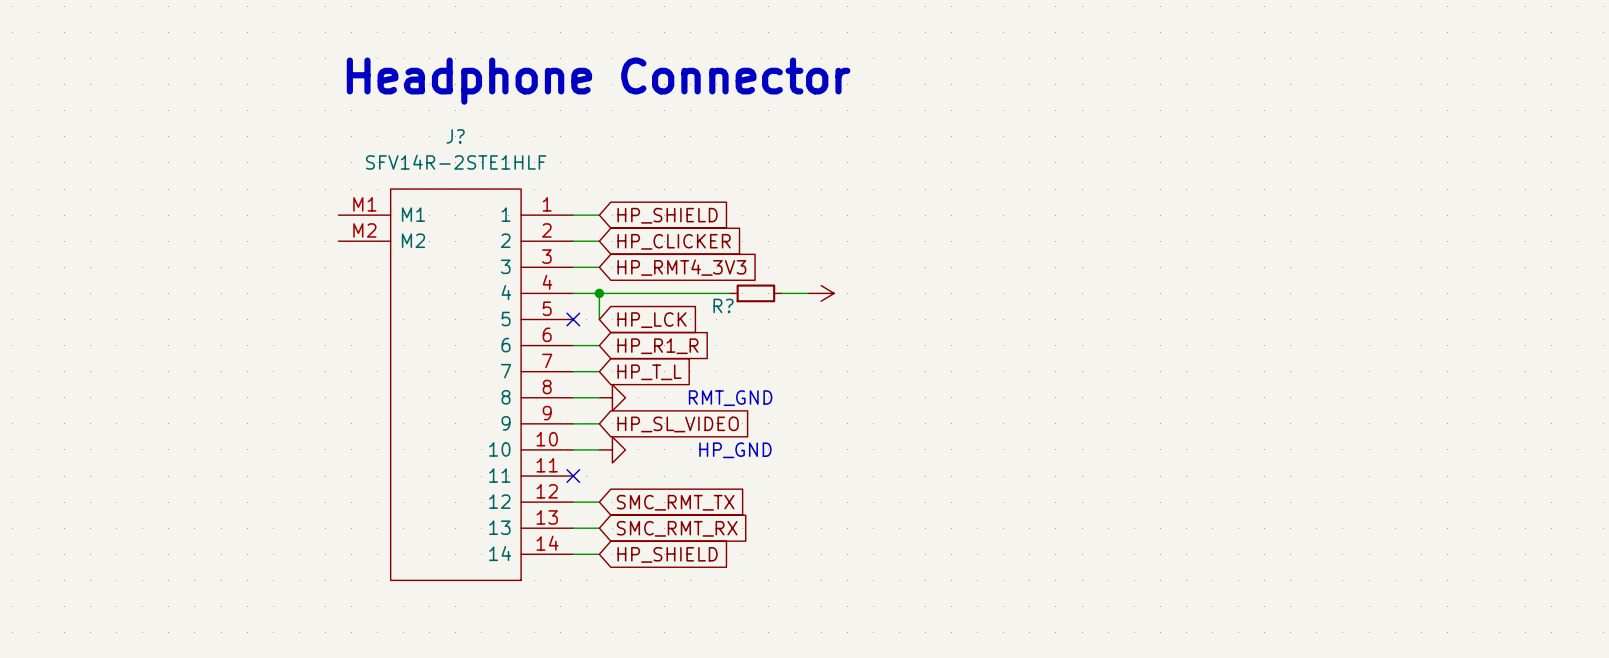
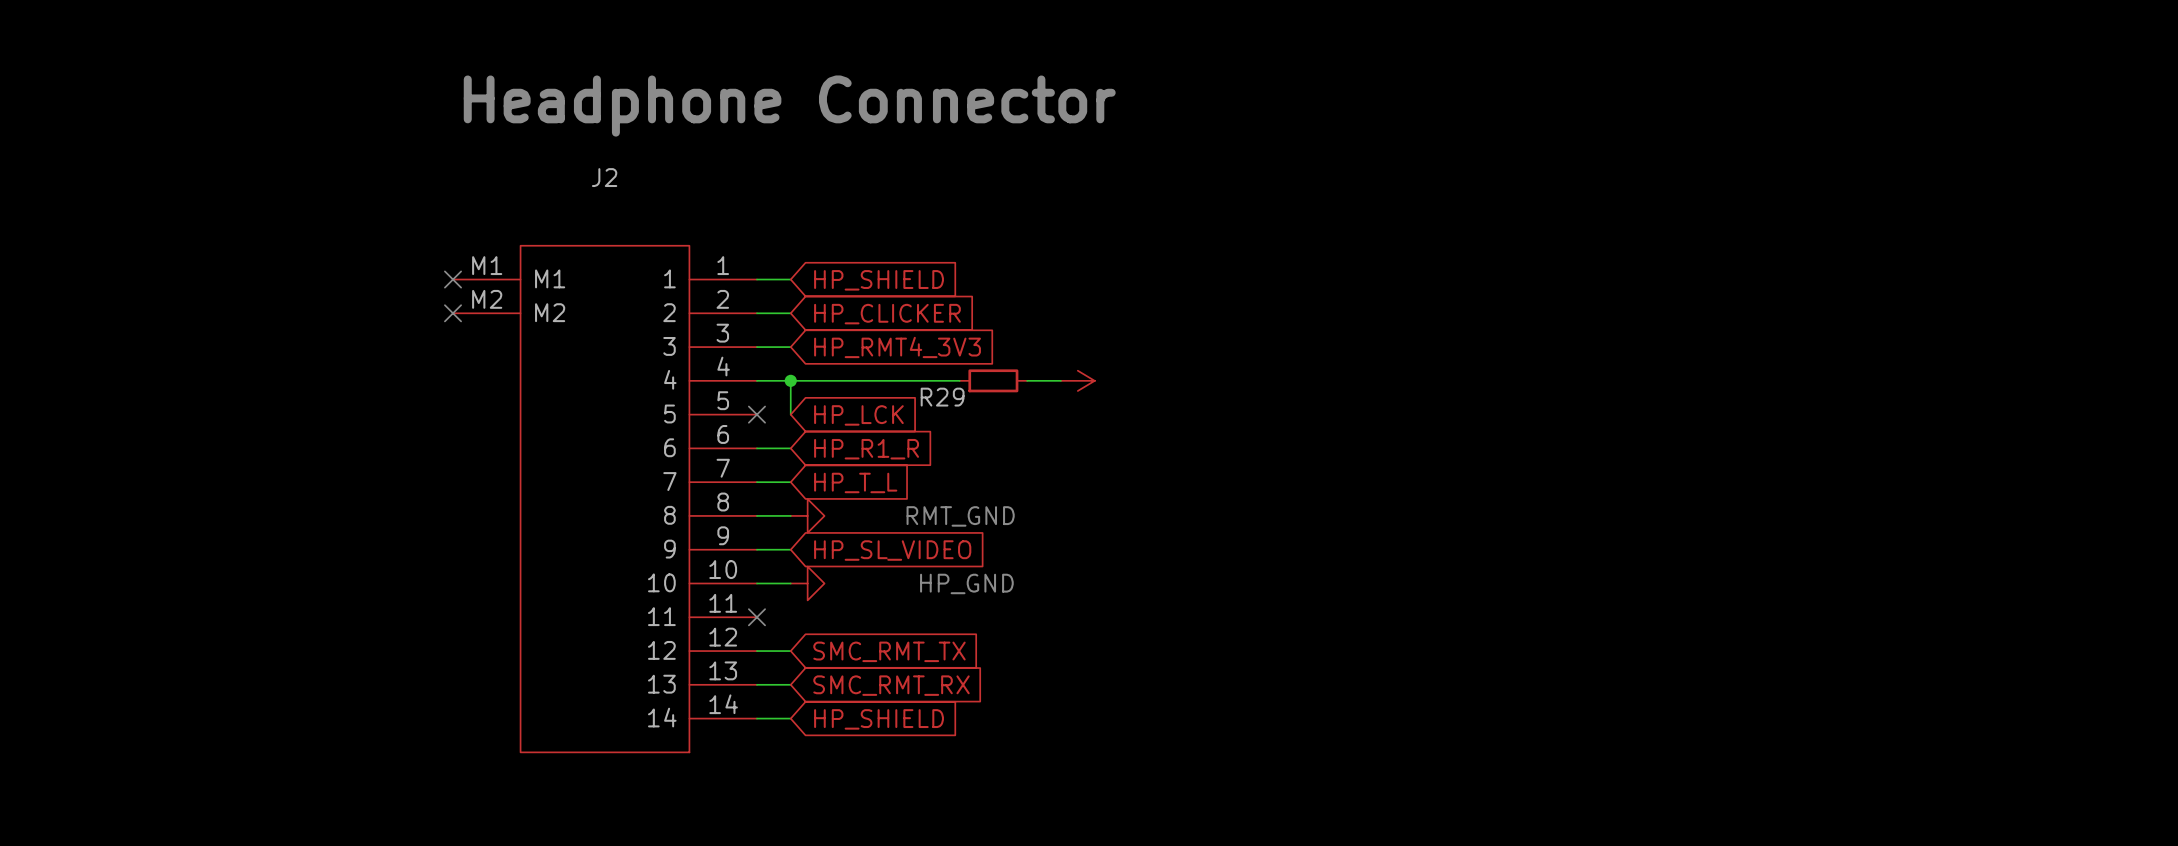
J? name: J? (455, 136) -> J2 (604, 177)
J? value: SFV14R-2STE1HLF (456, 162) -> none
no-connect mark: none -> (453, 279)
no-connect mark: none -> (453, 313)
R? name: R? (723, 305) -> R29 (942, 397)

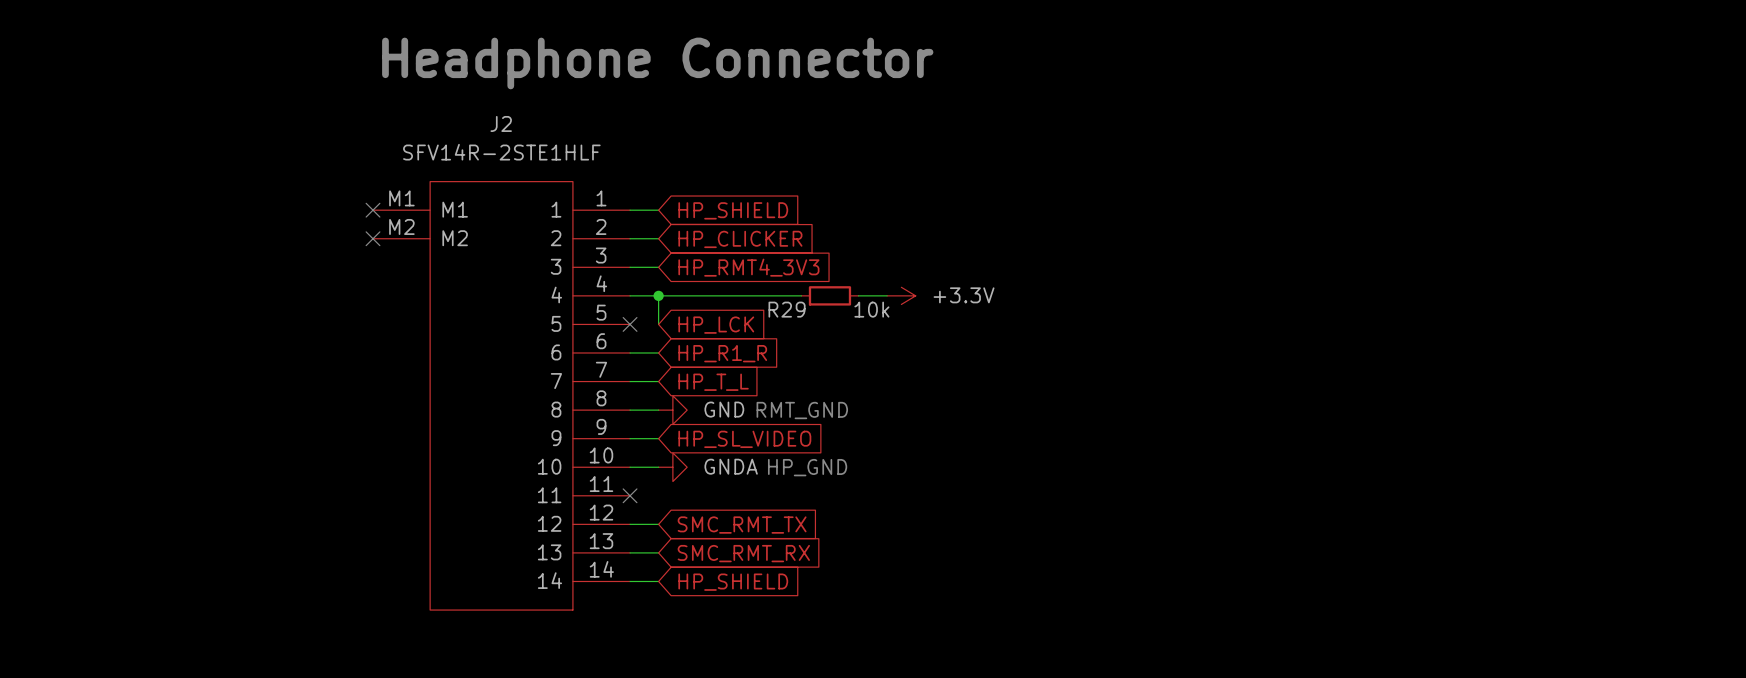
J2 value: none -> SFV14R-2STE1HLF (501, 152)
power symbol text: none -> +3.3V (964, 295)
R29 value: none -> 10k (871, 309)
power symbol text: none -> GND (724, 409)
power symbol text: none -> GNDA (731, 466)

